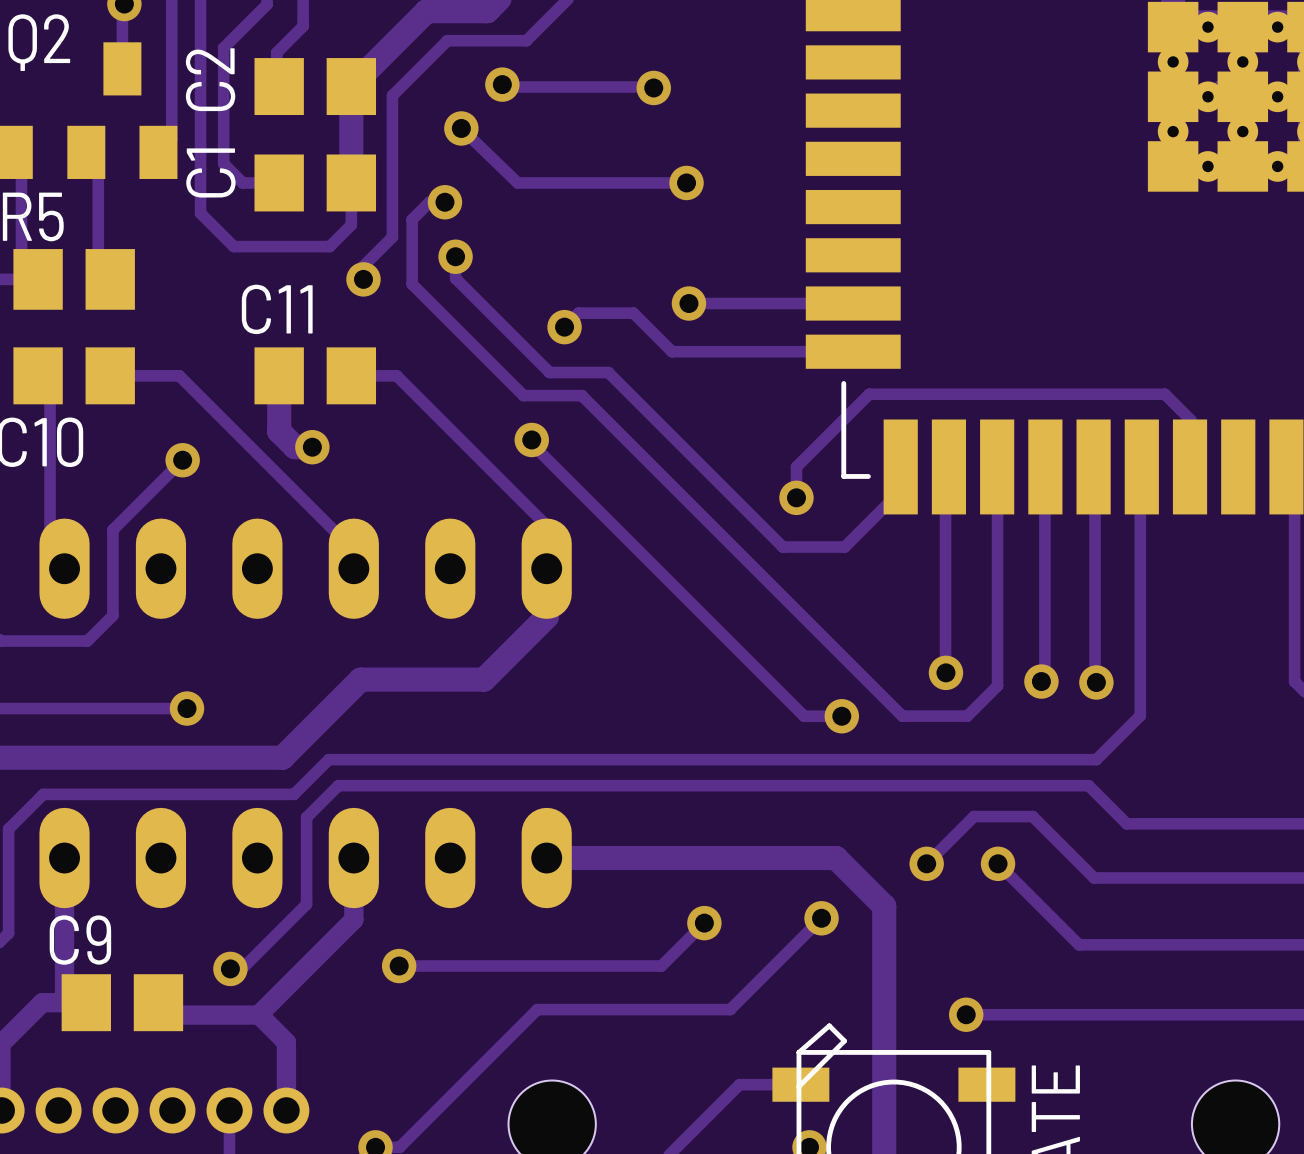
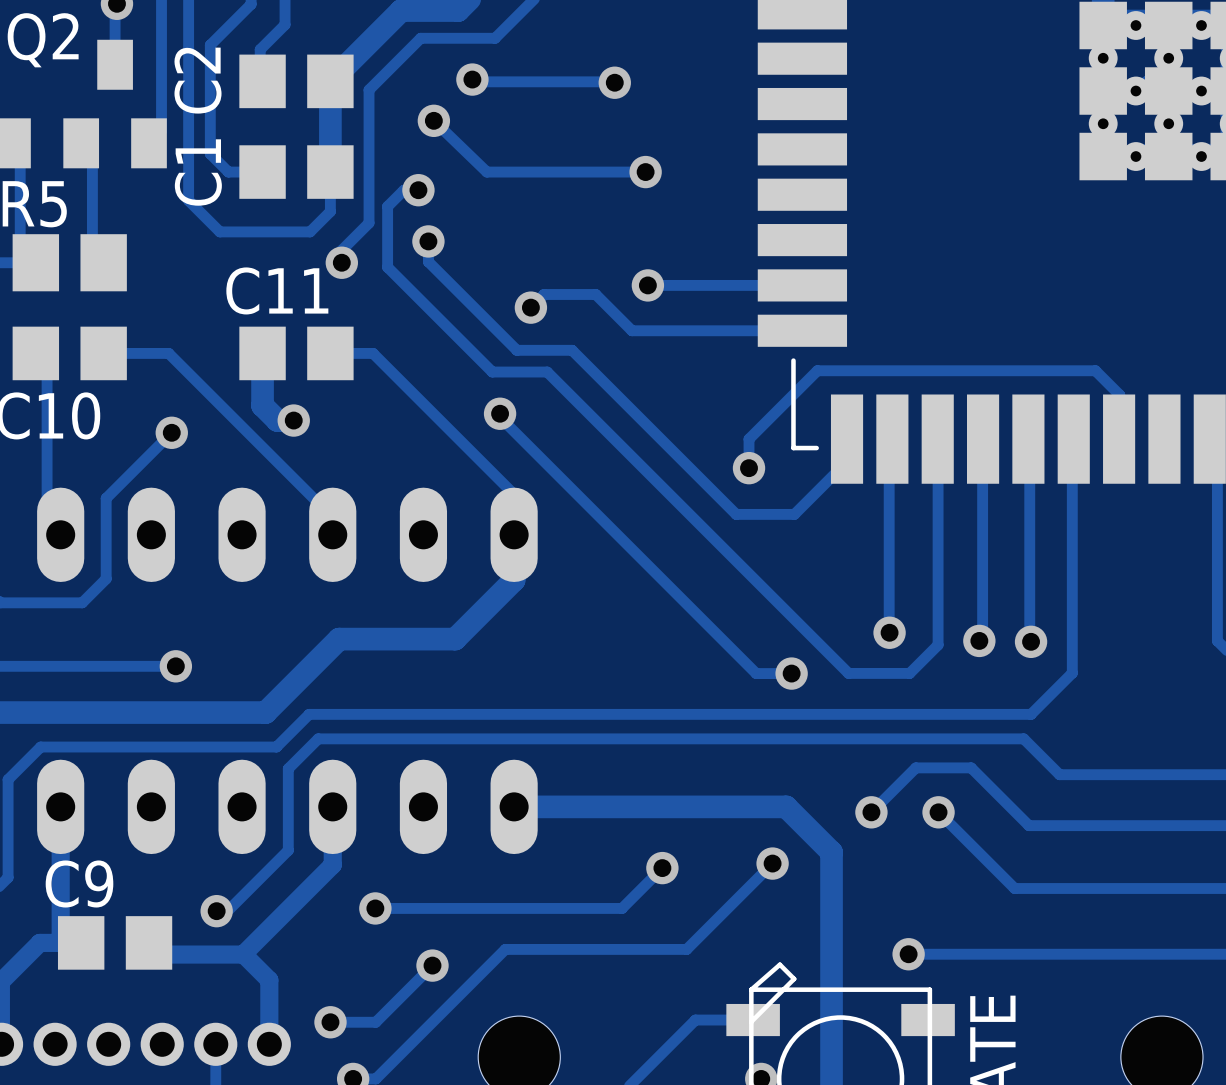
track: none -> (432, 965) (375, 1022) (330, 1022)
via: none -> (432, 965)
via: none -> (330, 1022)

